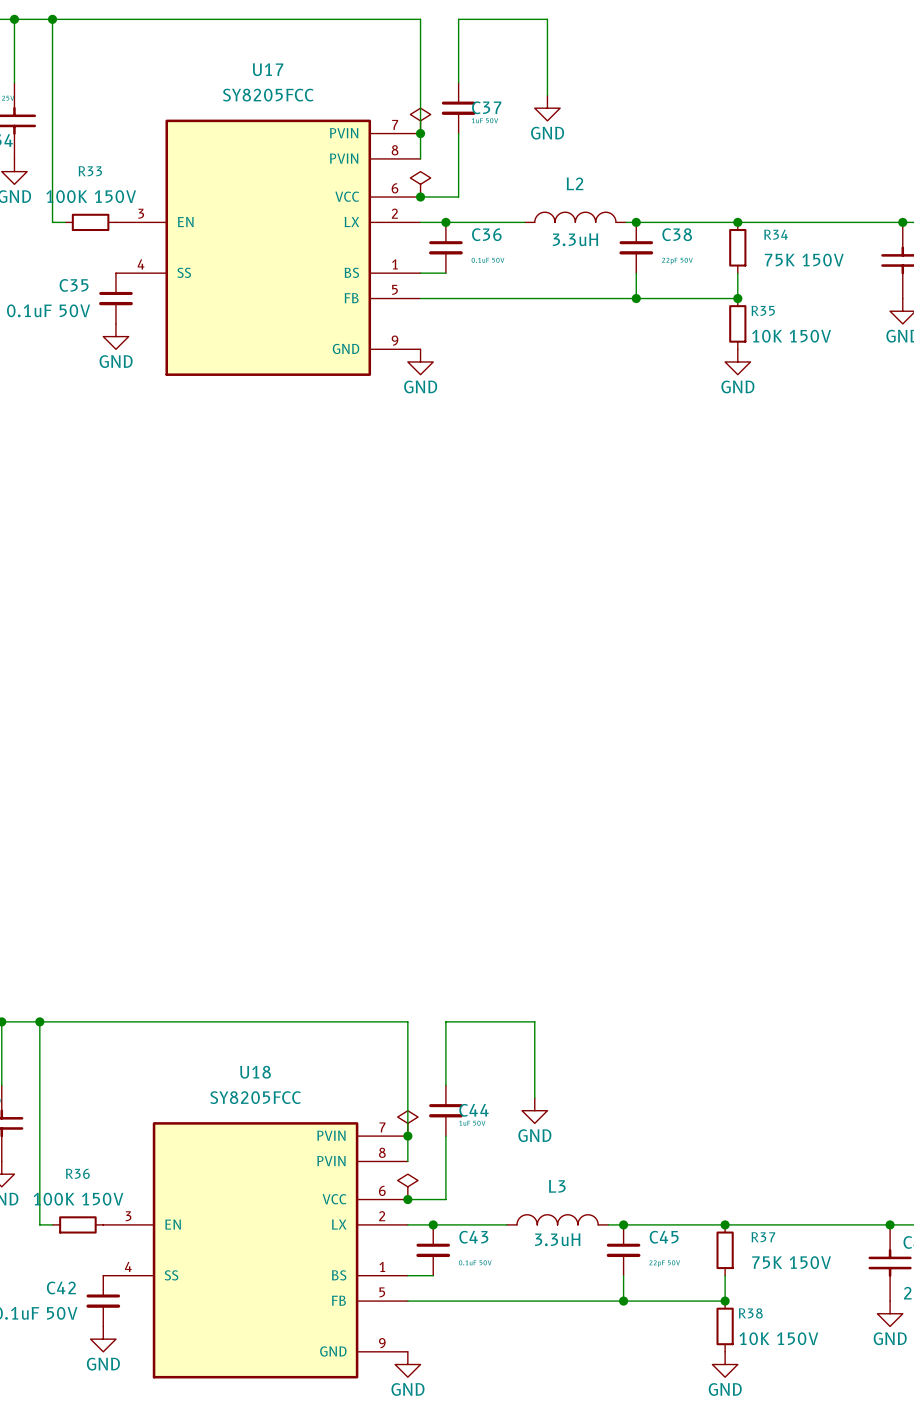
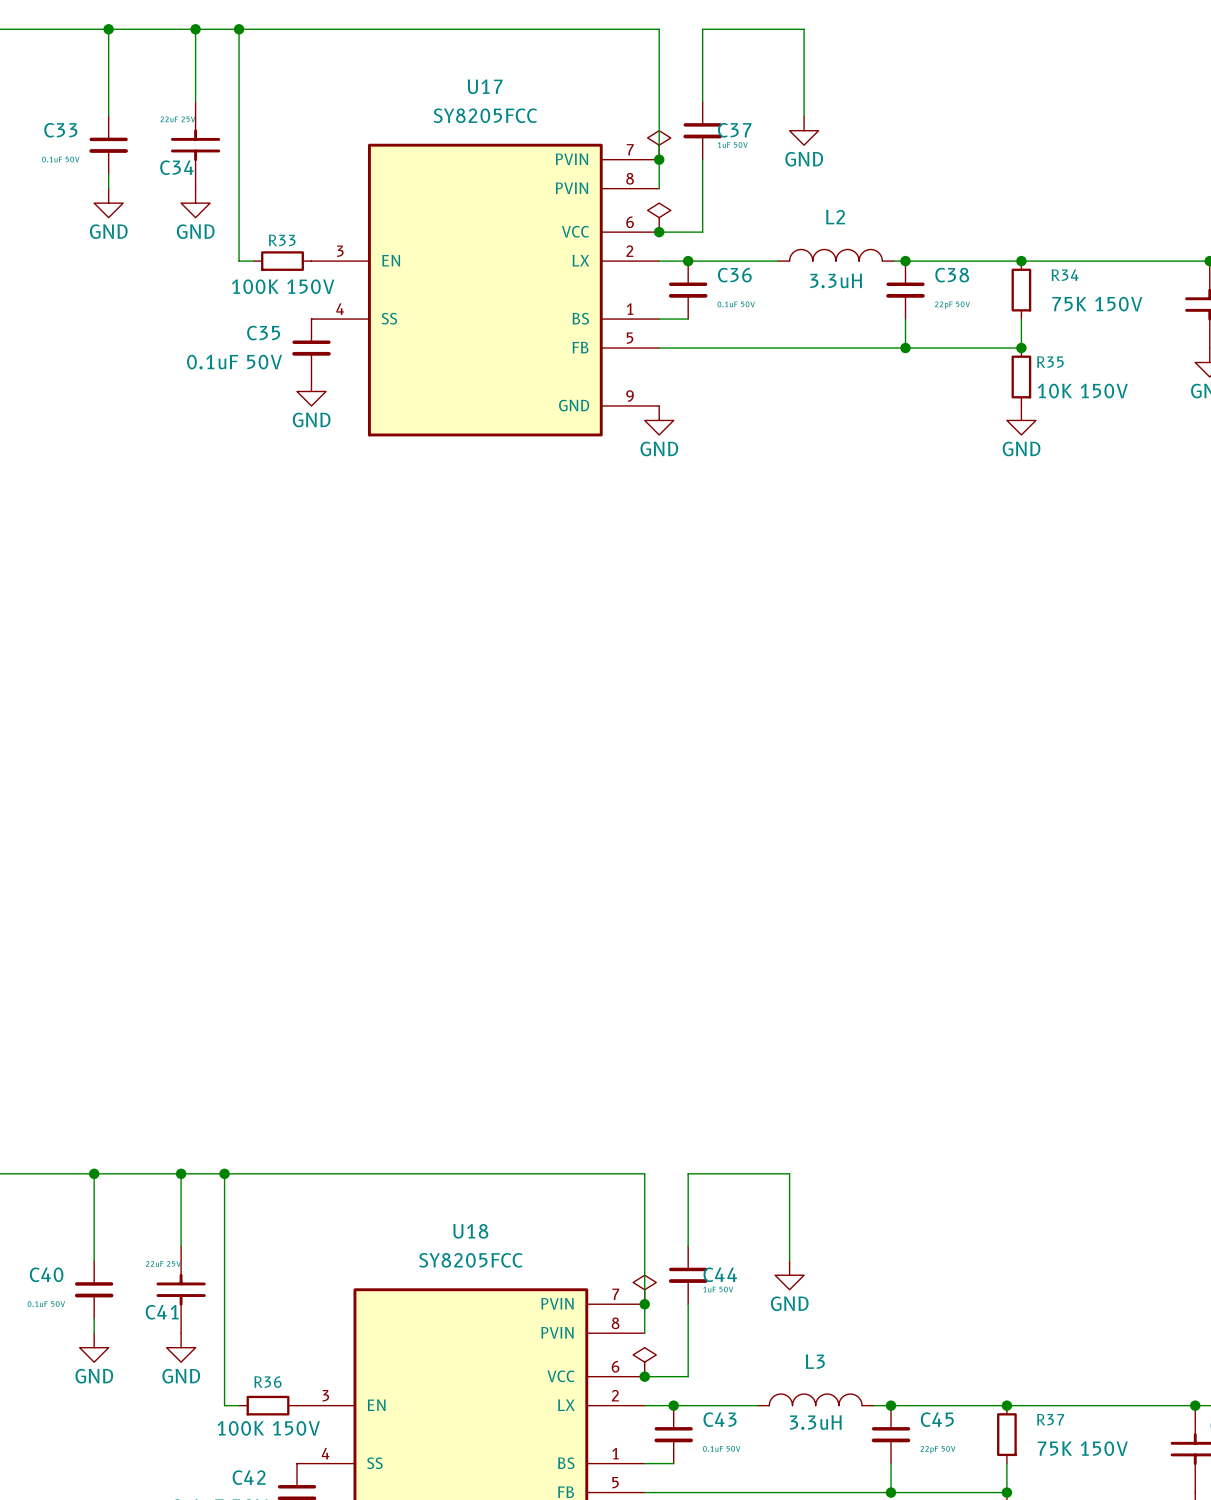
R33 name position: R33 (90, 171) -> R33 (282, 240)
R33 value position: 100K 150V (91, 196) -> 100K 150V (283, 286)
R36 name position: R36 (77, 1173) -> R36 (267, 1382)
R36 value position: 100K 150V (78, 1199) -> 100K 150V (268, 1428)

